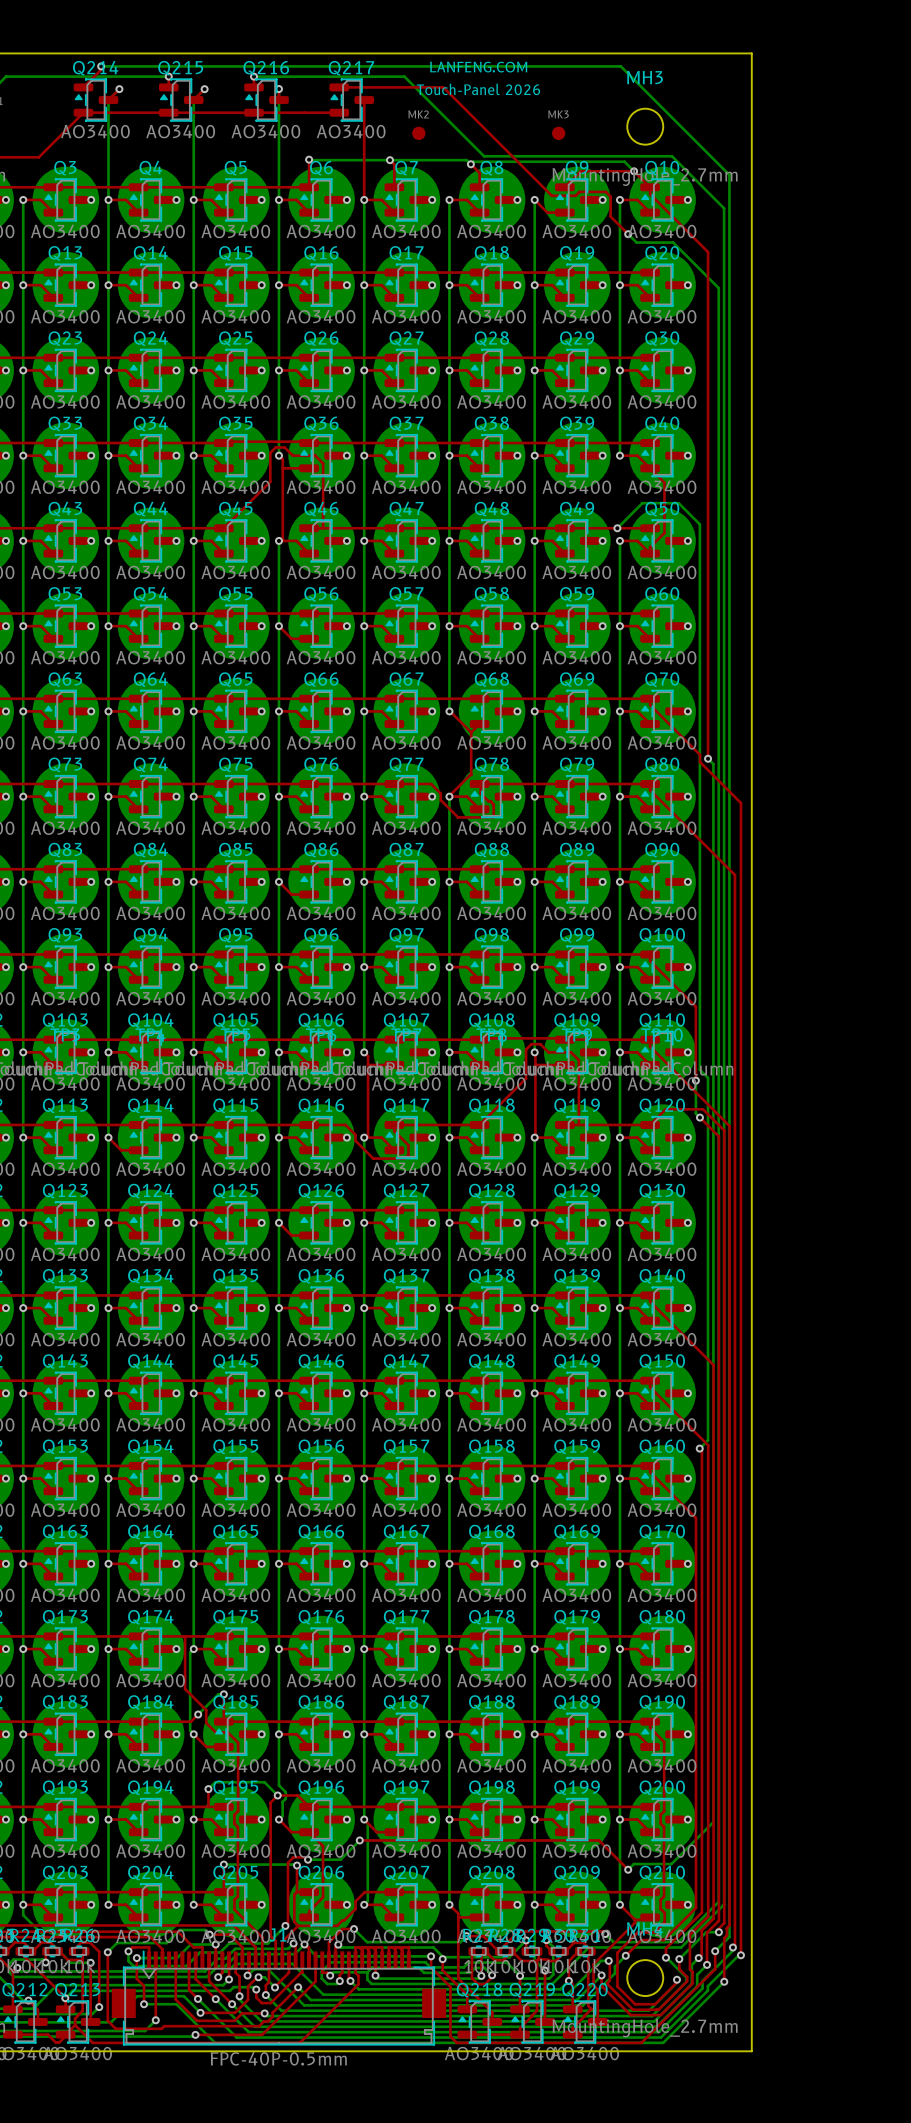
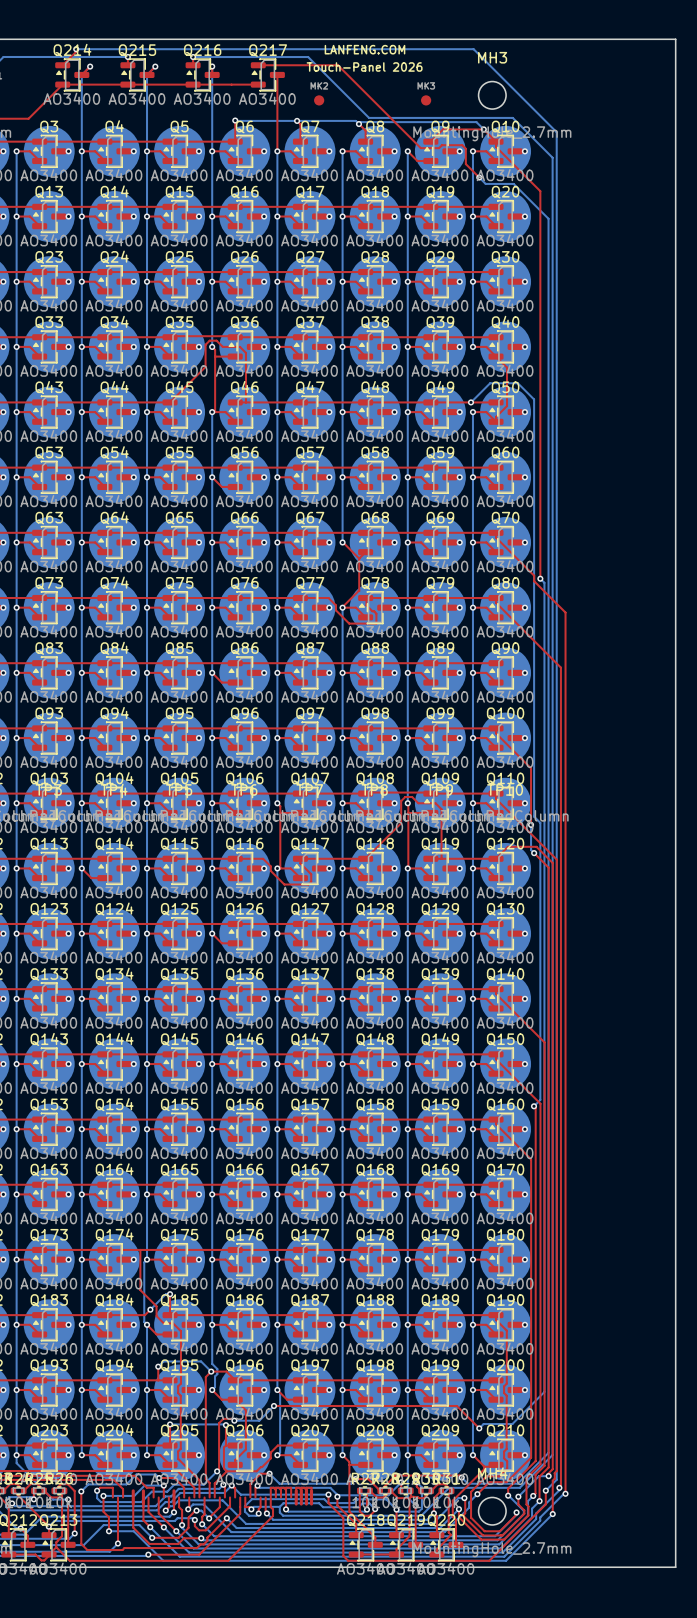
board edge: (751, 53) (751, 2051) -> (573, 39) (675, 39) (675, 1567) (573, 1567)
top track: none -> (133, 1490) (133, 1504)
top track: none -> (143, 1490) (143, 1504)
top track: none -> (174, 1490) (174, 1504)
top track: none -> (296, 1490) (296, 1504)
top track: none -> (301, 1490) (301, 1504)
top track: none -> (306, 1490) (306, 1504)
top track: none -> (311, 1490) (311, 1504)
J1: FPC-40P-0.5mm (278, 1998) -> none

